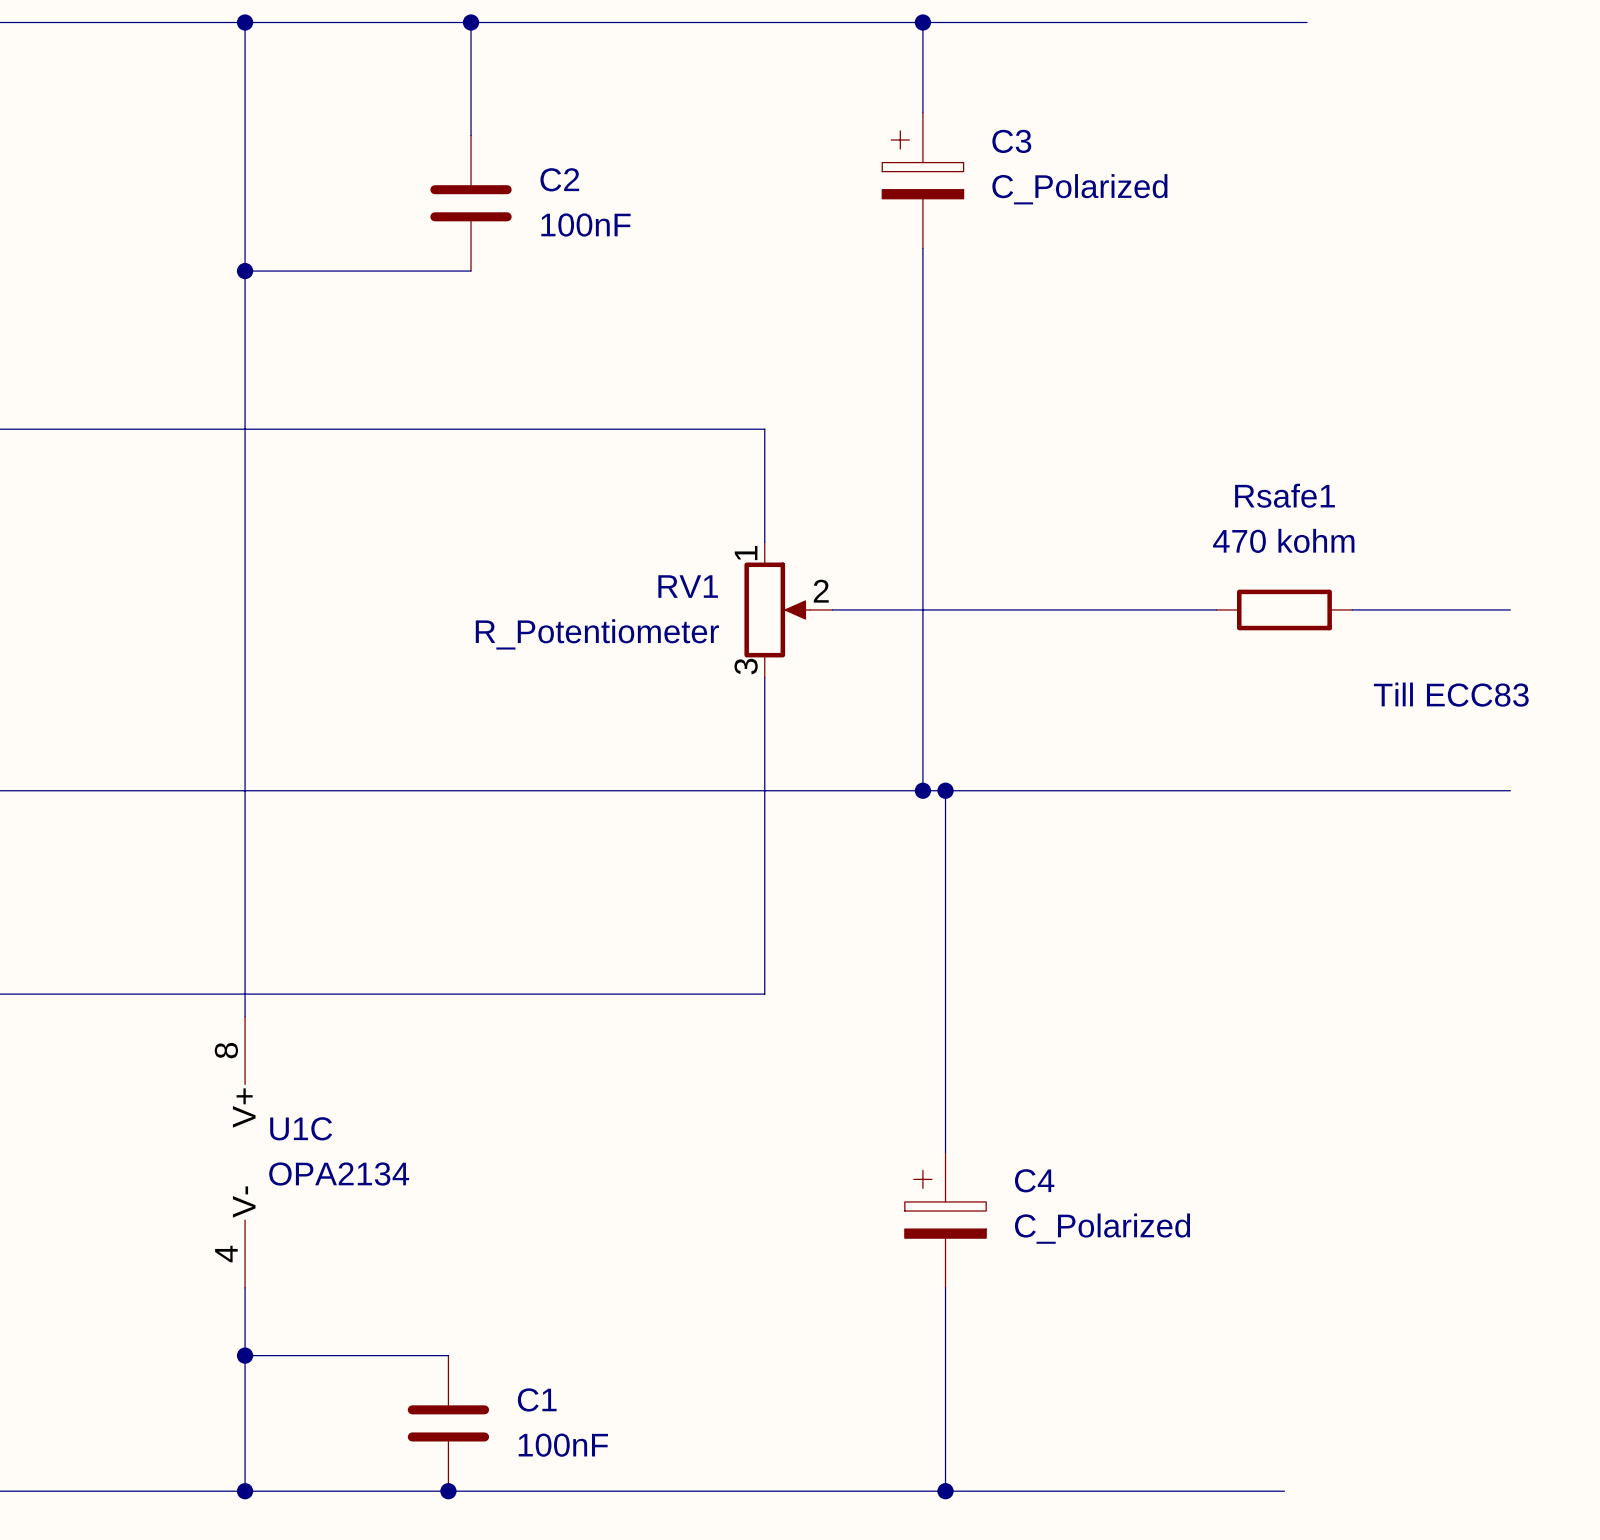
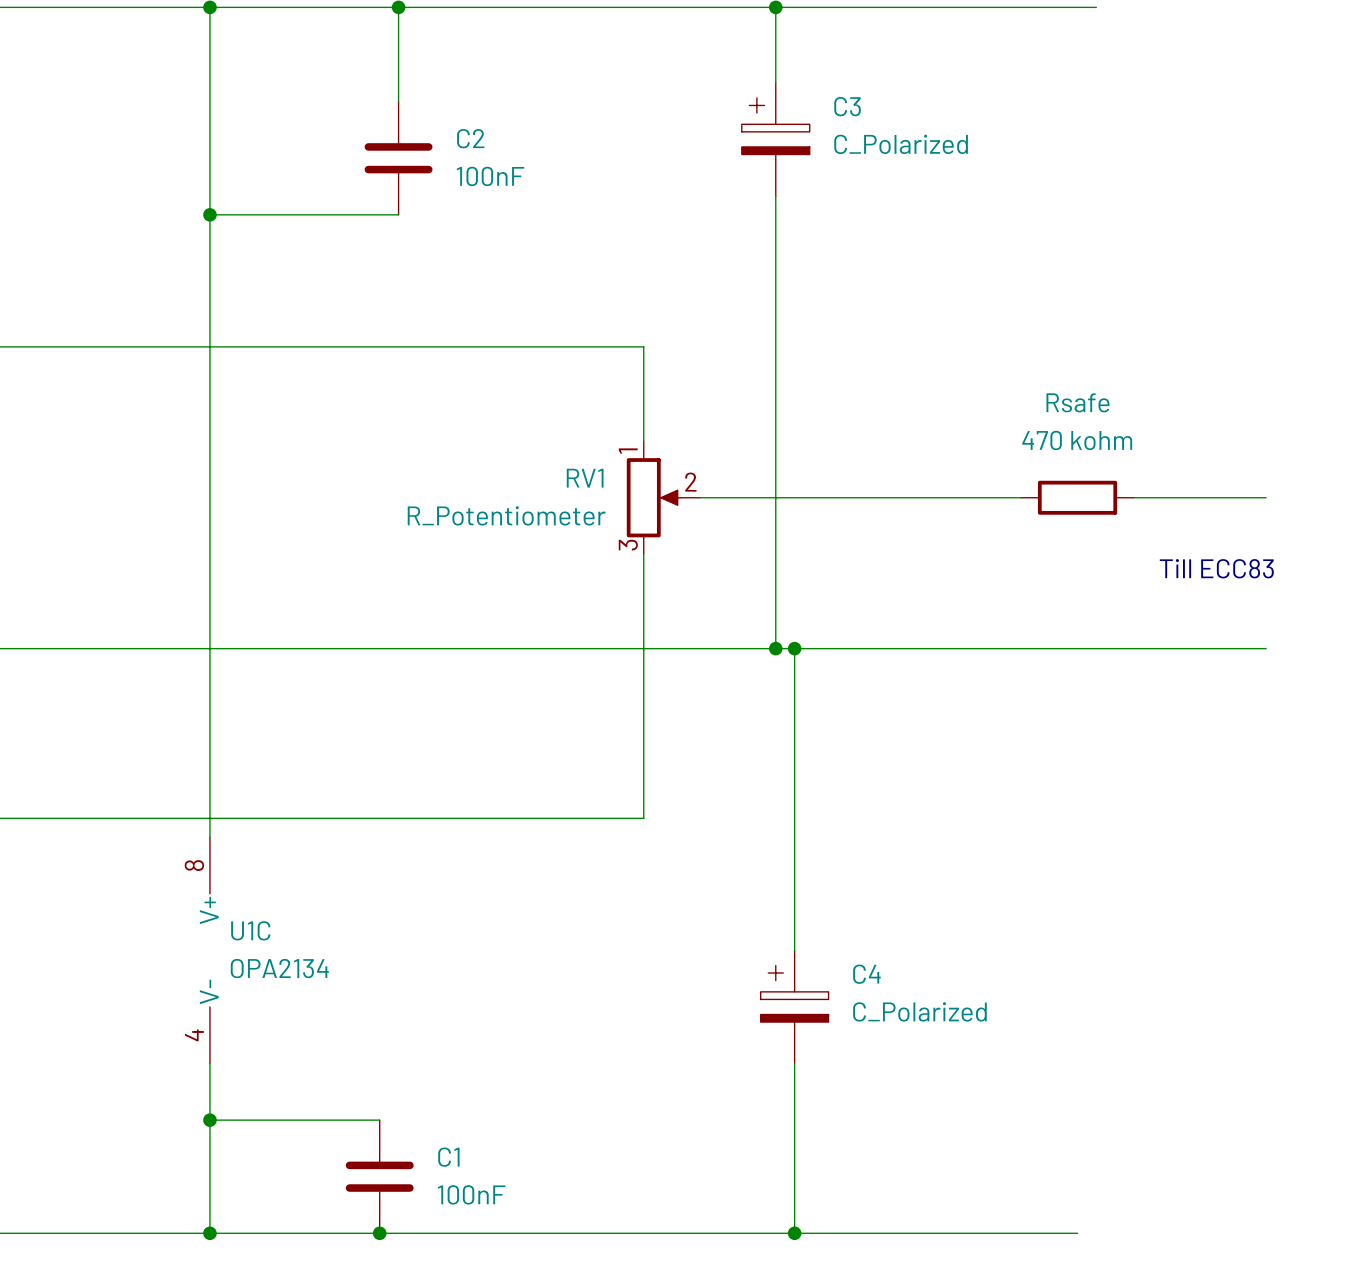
Rsafe1 name: Rsafe1 (1284, 495) -> Rsafe (1077, 402)

